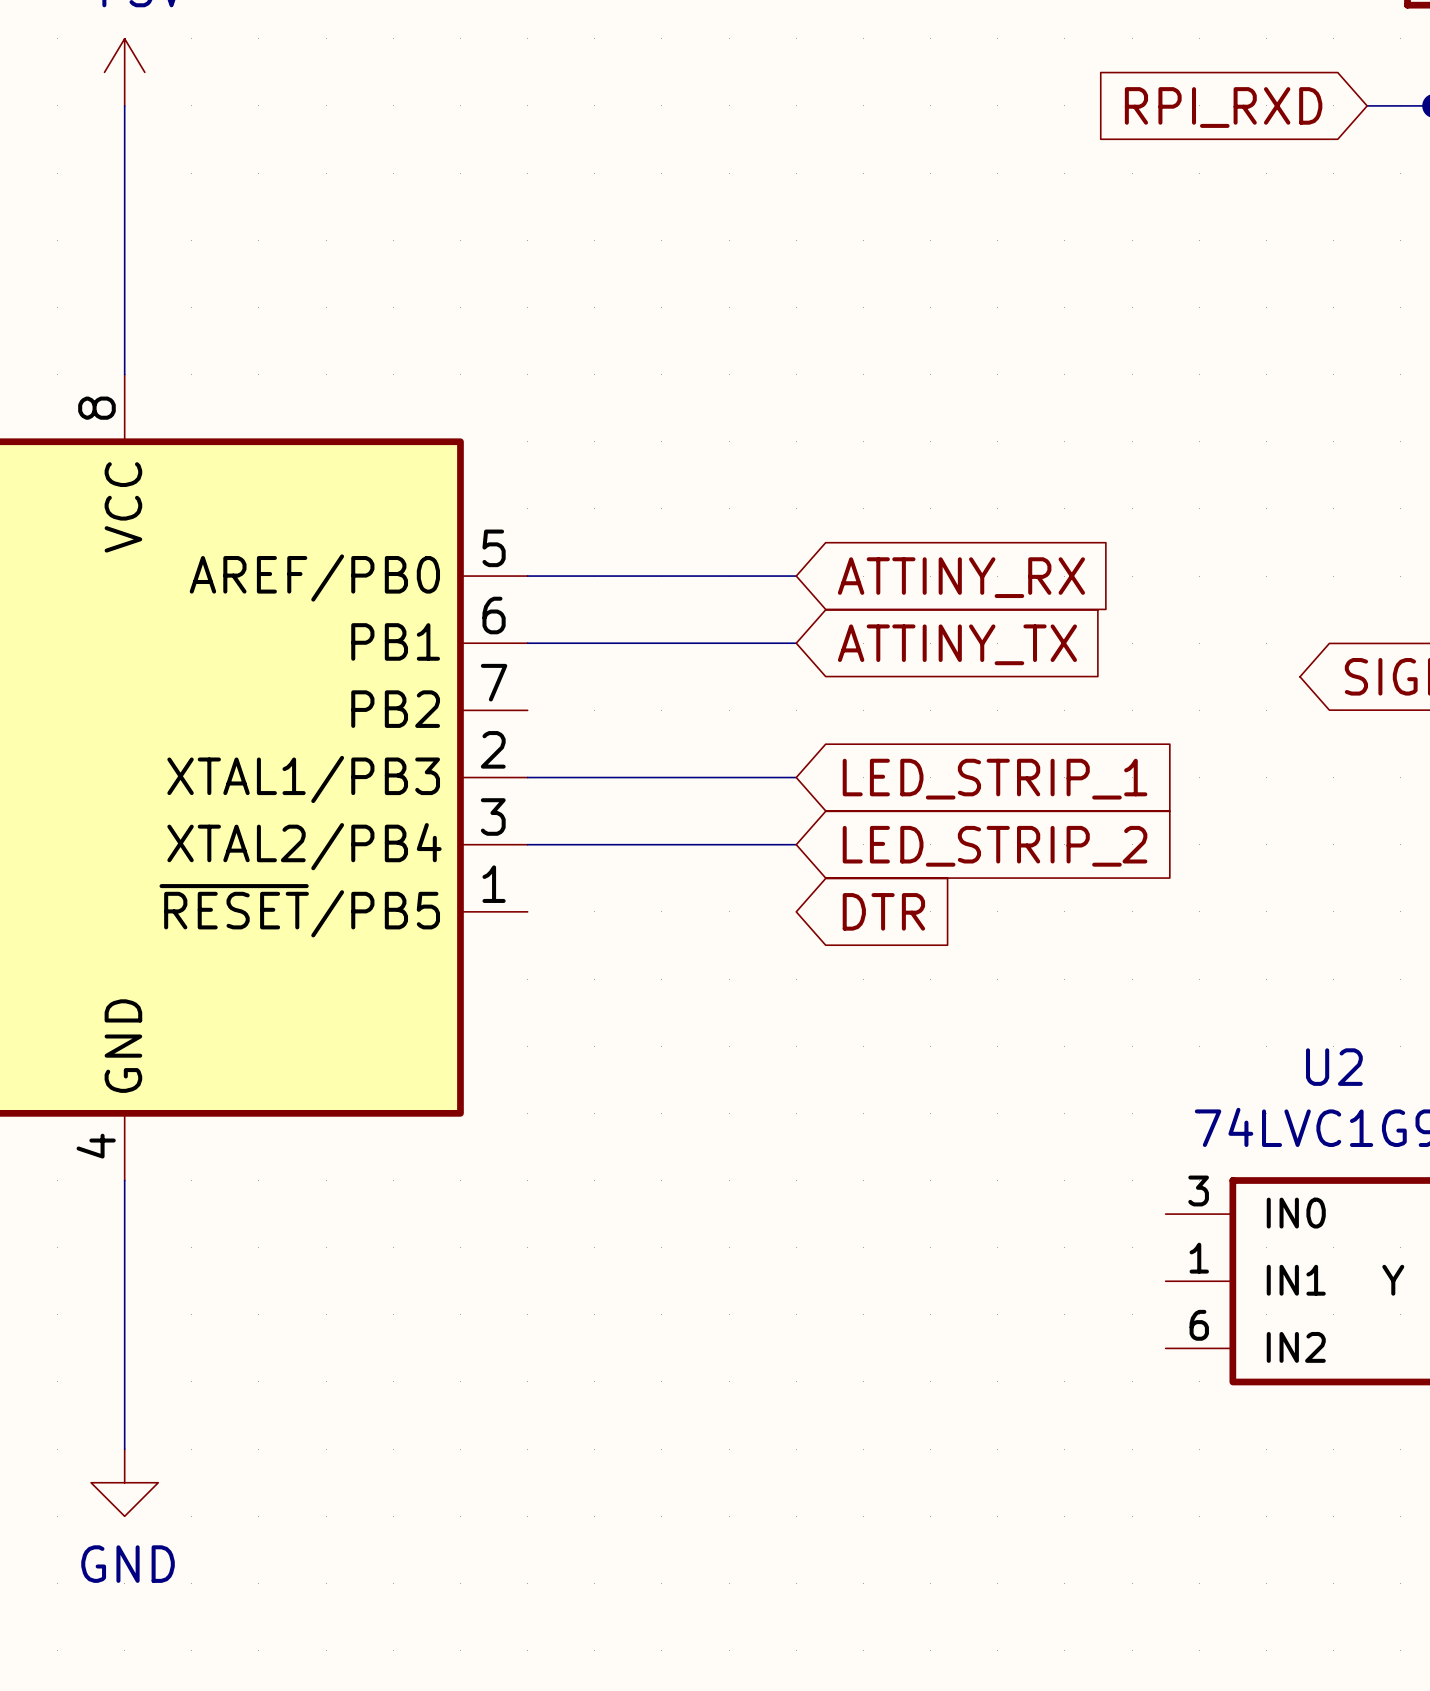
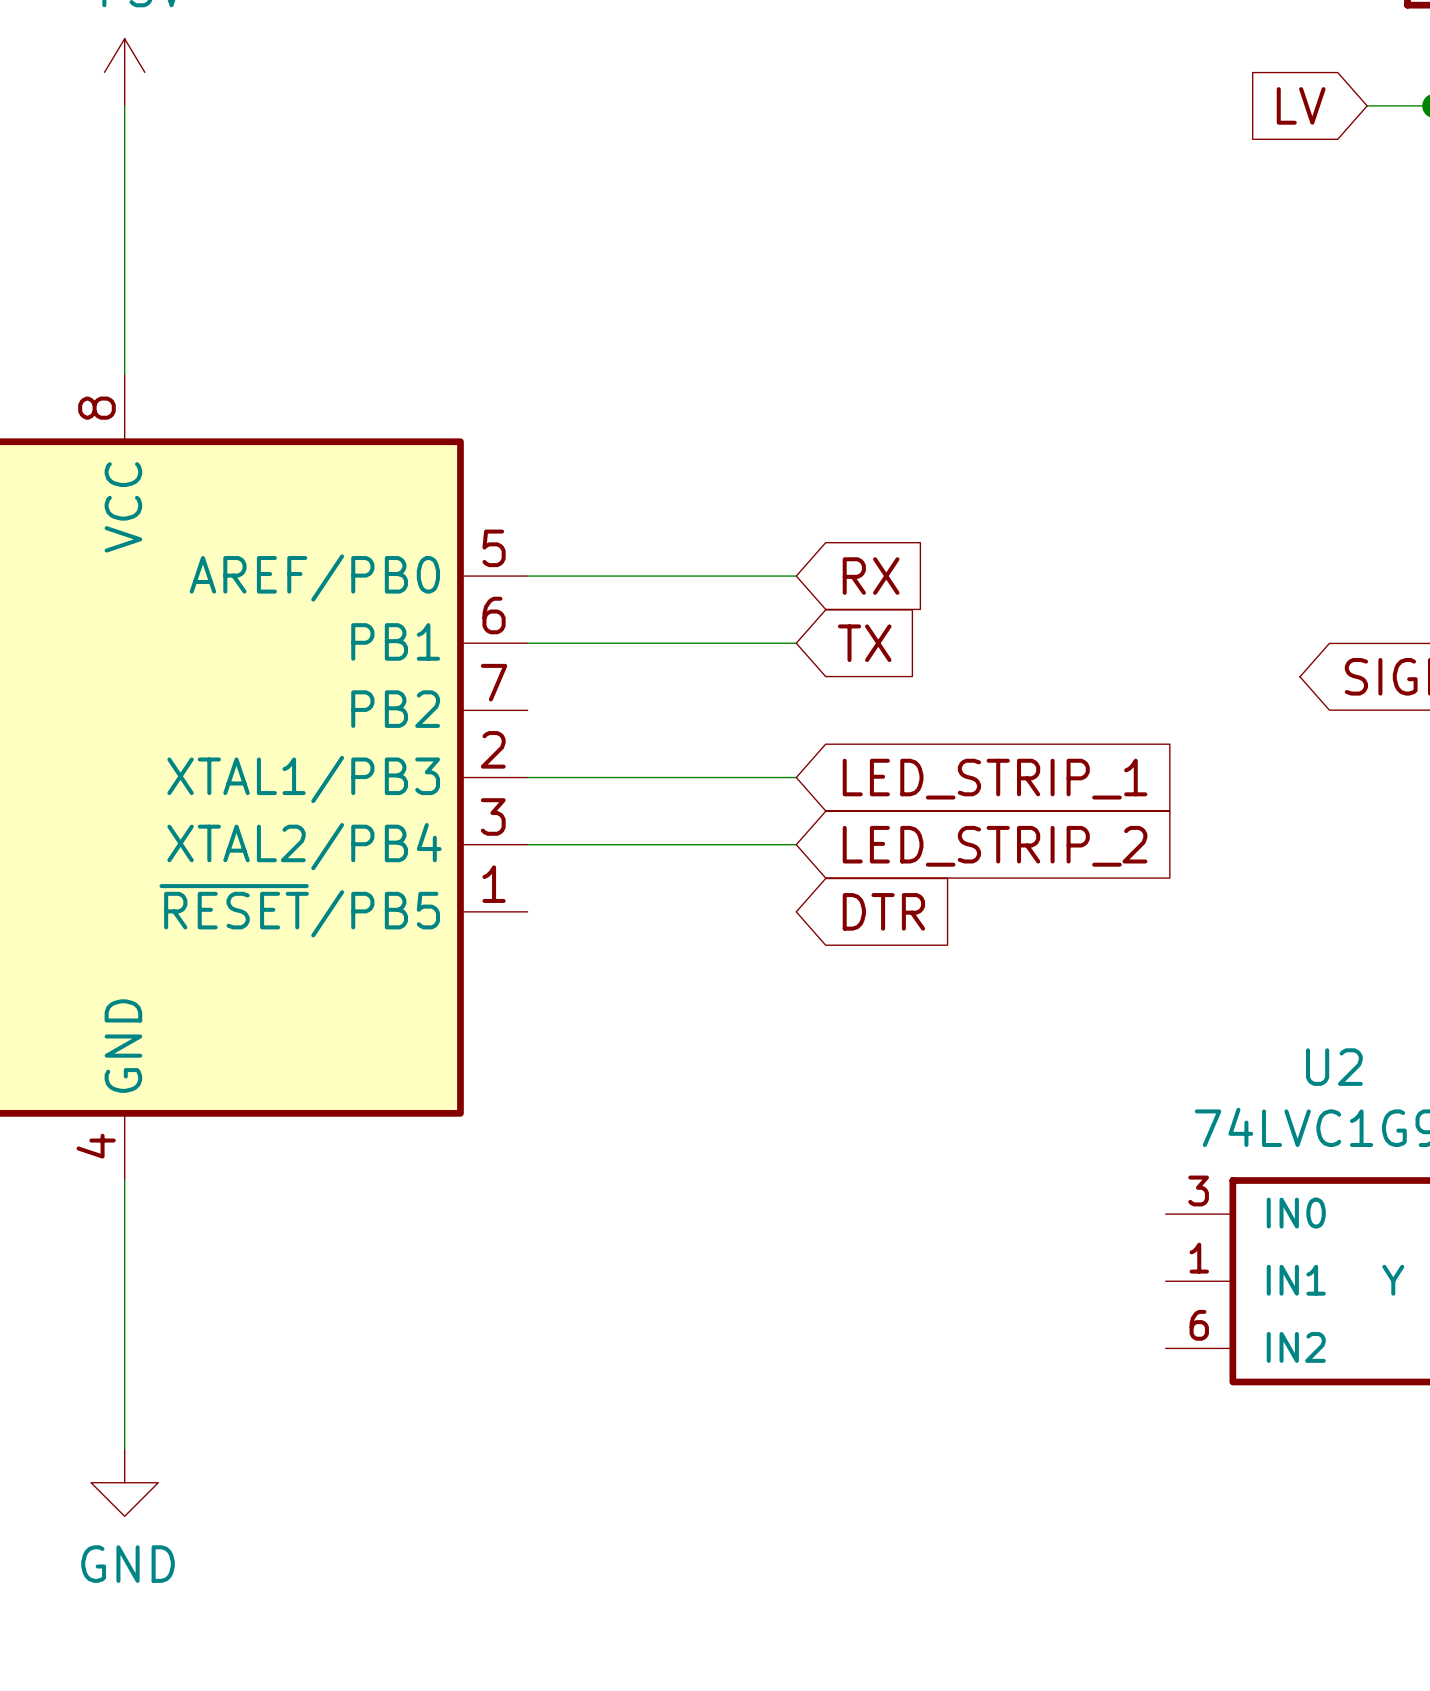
global label: RPI_RXD (1223, 107) -> LV (1301, 105)
global label: ATTINY_RX (961, 577) -> RX (871, 576)
global label: ATTINY_TX (957, 644) -> TX (864, 643)

